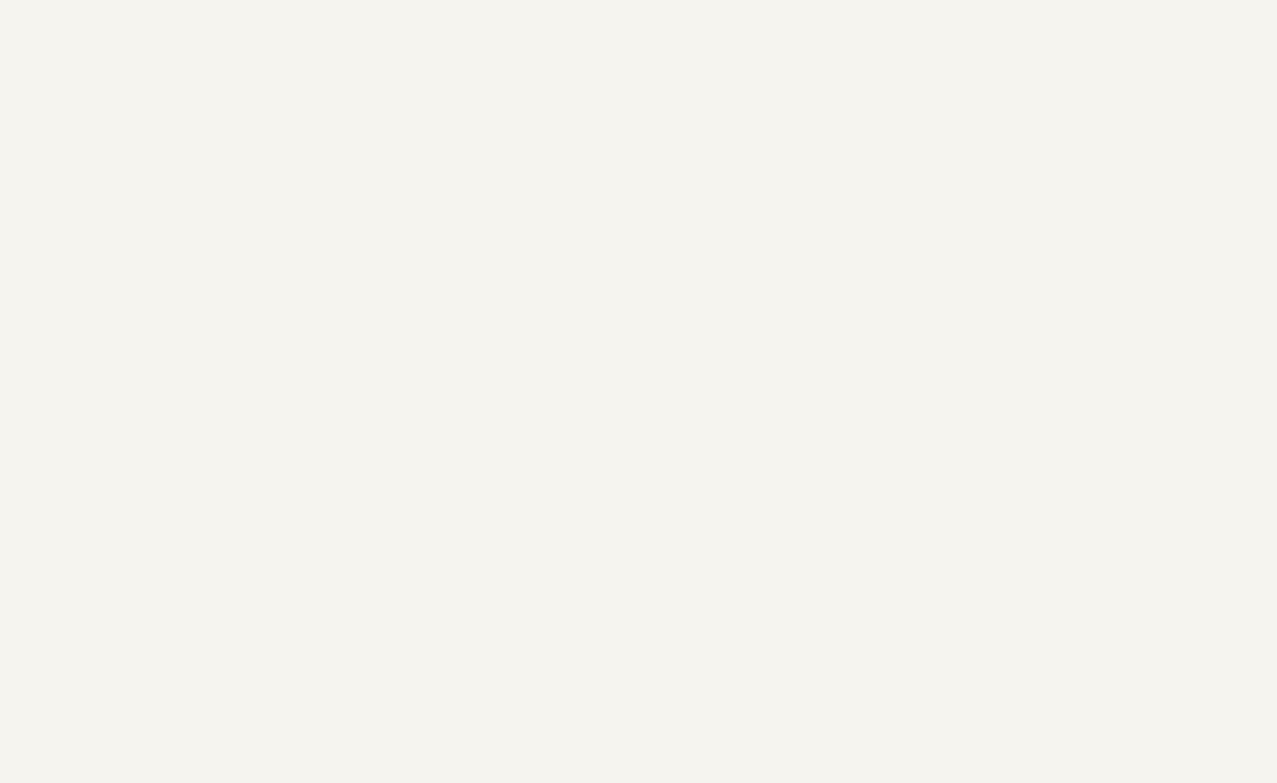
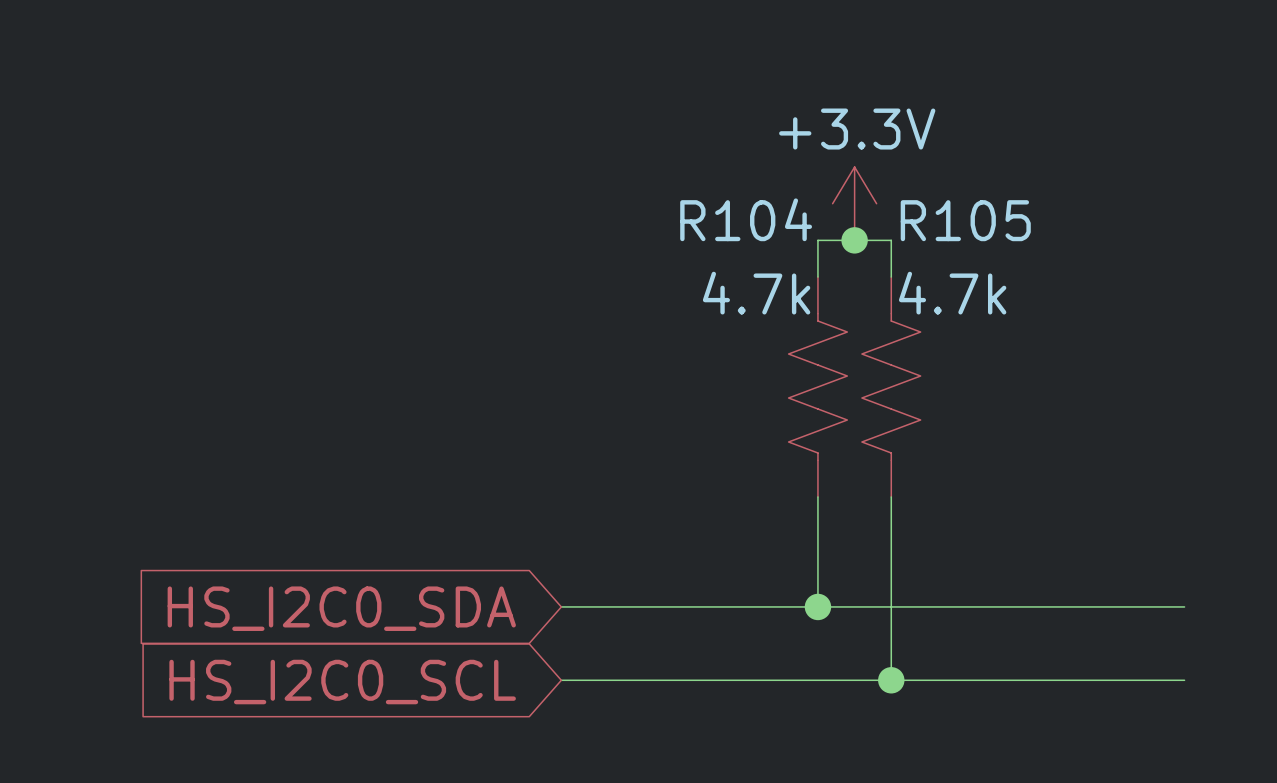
power symbol: none -> +3.3V (854, 203)
junction: none -> (854, 240)
wire: none -> (817, 277) (817, 240) (891, 240) (891, 277)
R104: none -> 4.7k (817, 387)
R105: none -> 4.7k (891, 387)
wire: none -> (817, 496) (817, 606)
wire: none -> (891, 496) (891, 680)
wire: none -> (561, 606) (1184, 606)
junction: none -> (817, 606)
global label: none -> HS_I2C0_SDA (341, 608)
wire: none -> (561, 680) (1184, 680)
junction: none -> (891, 680)
global label: none -> HS_I2C0_SCL (342, 682)

